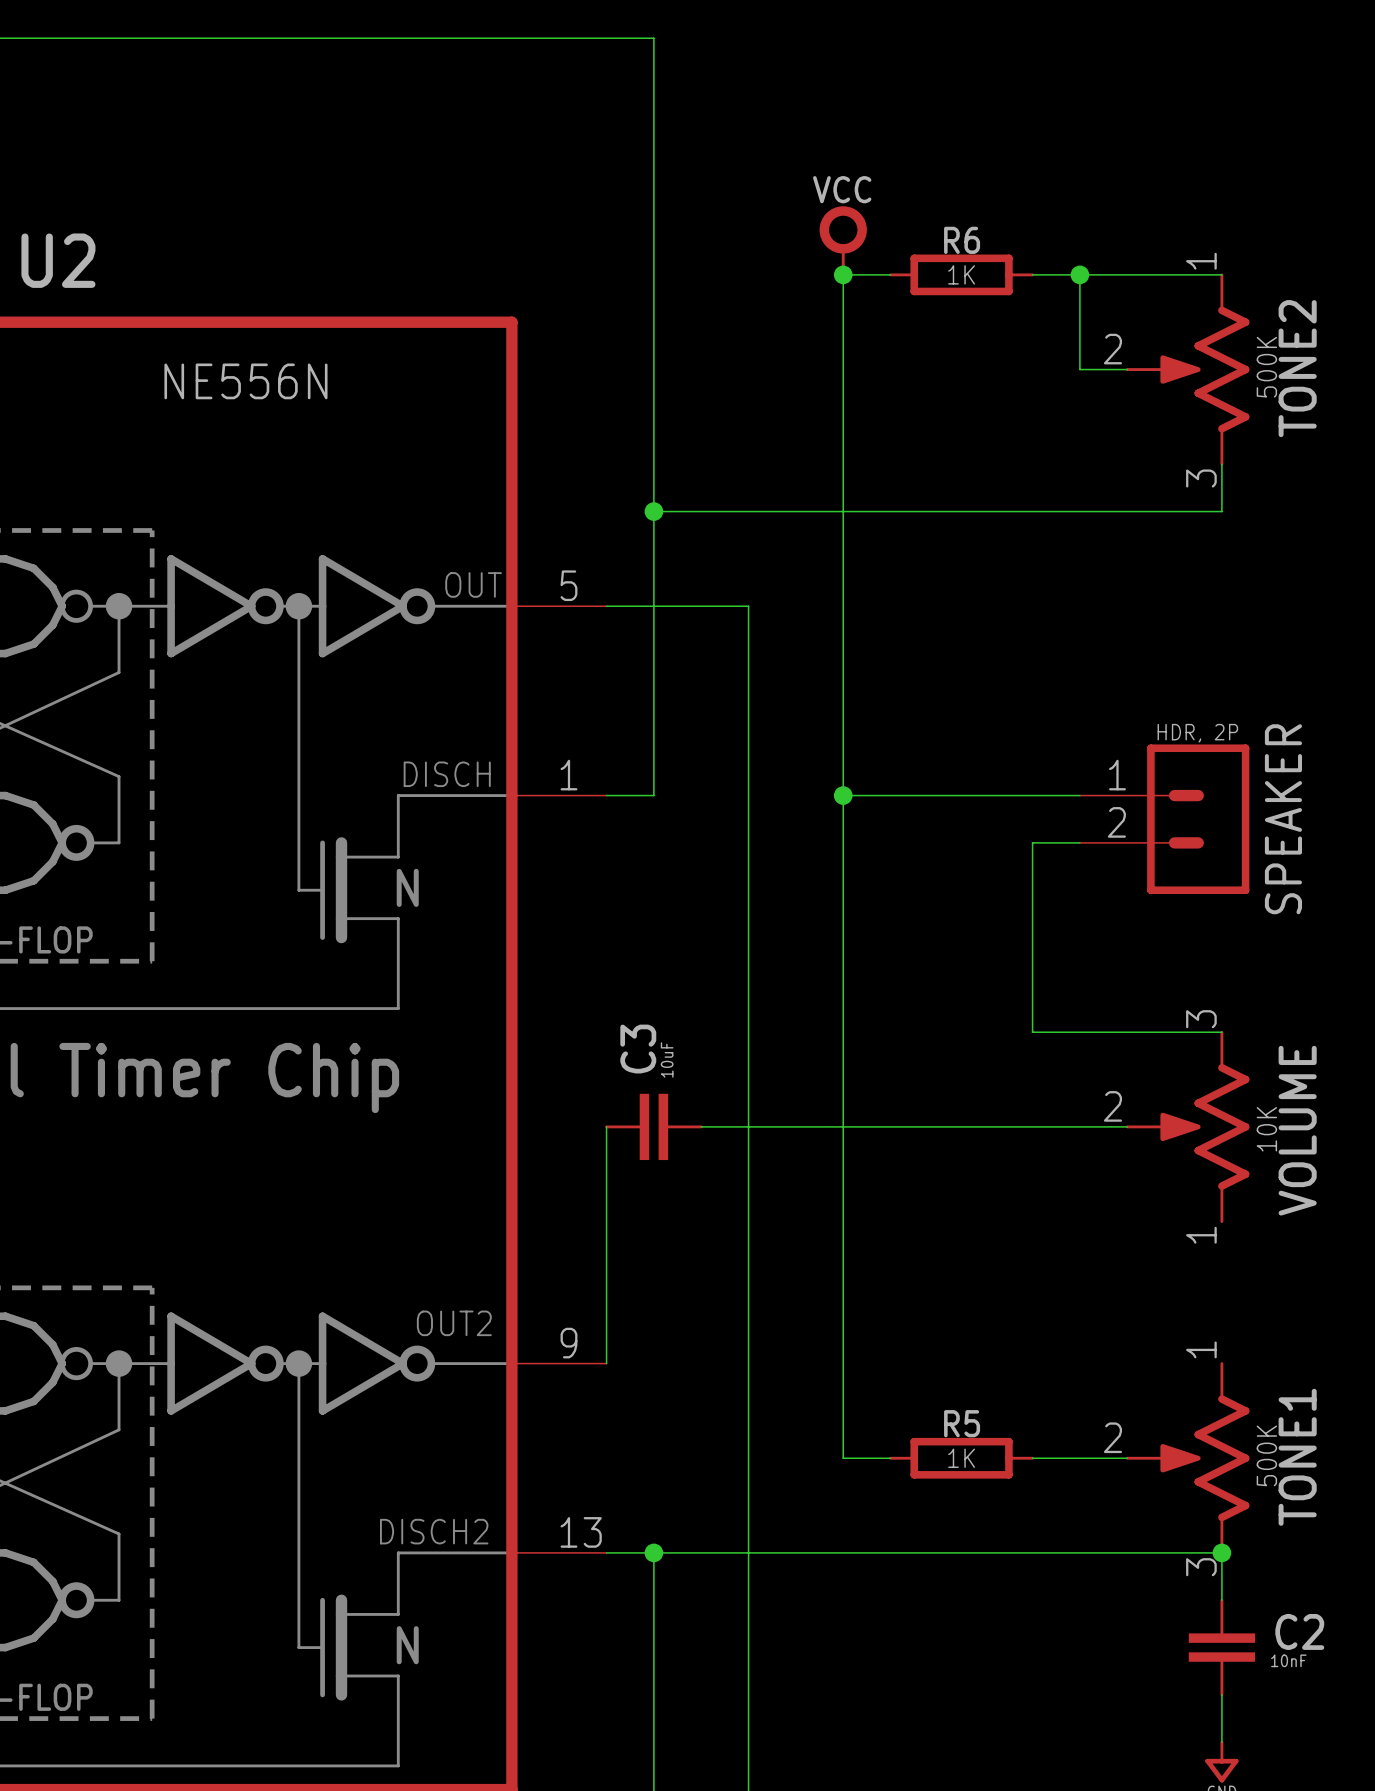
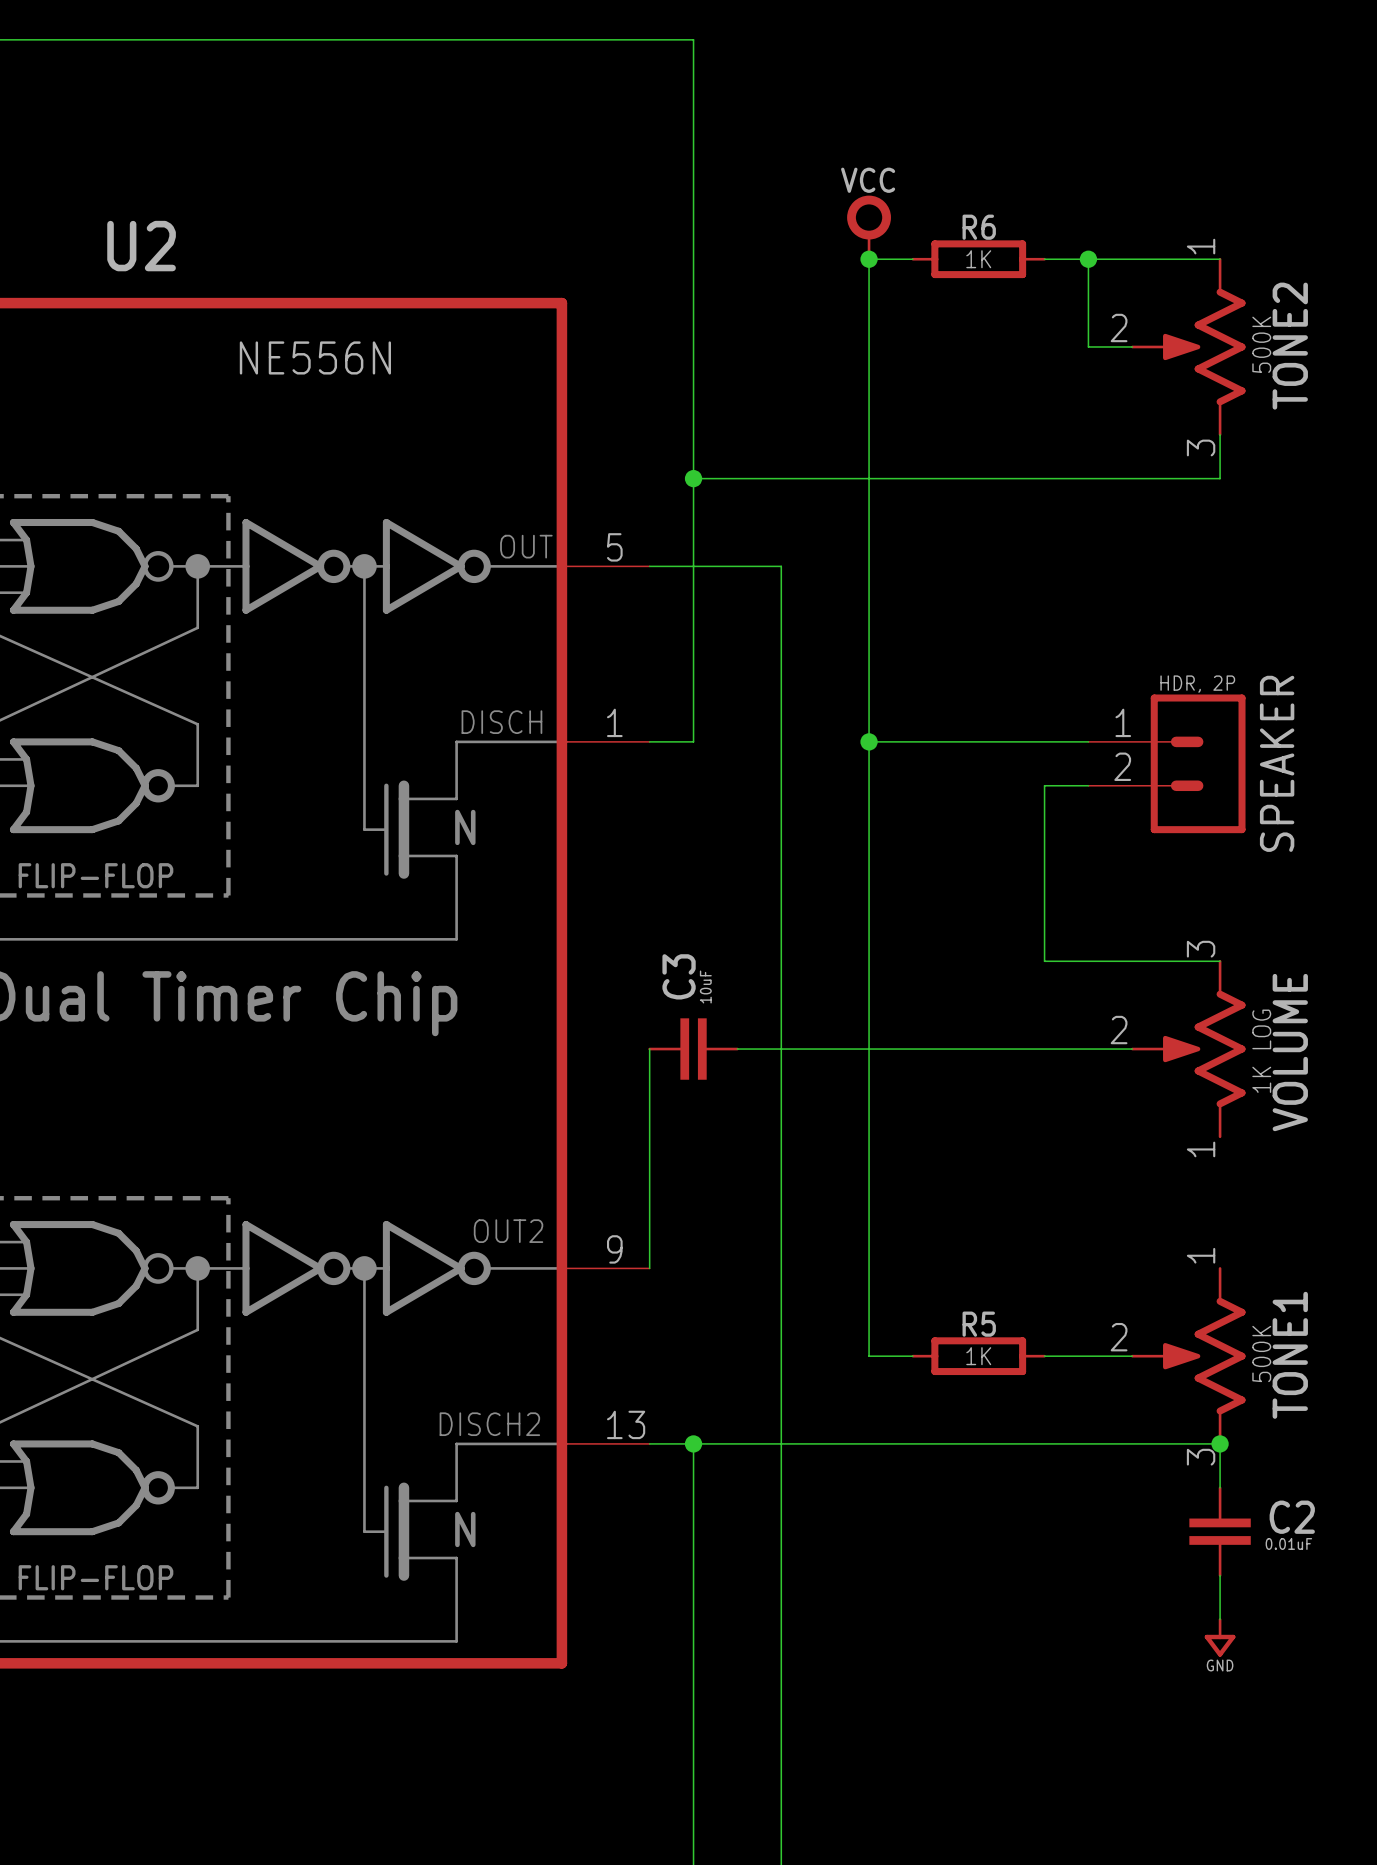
VOLUME value: 10K (1266, 1129) -> 1K LOG (1261, 1051)
C2 value: 10nF (1288, 1660) -> 0.01uF (1288, 1543)

